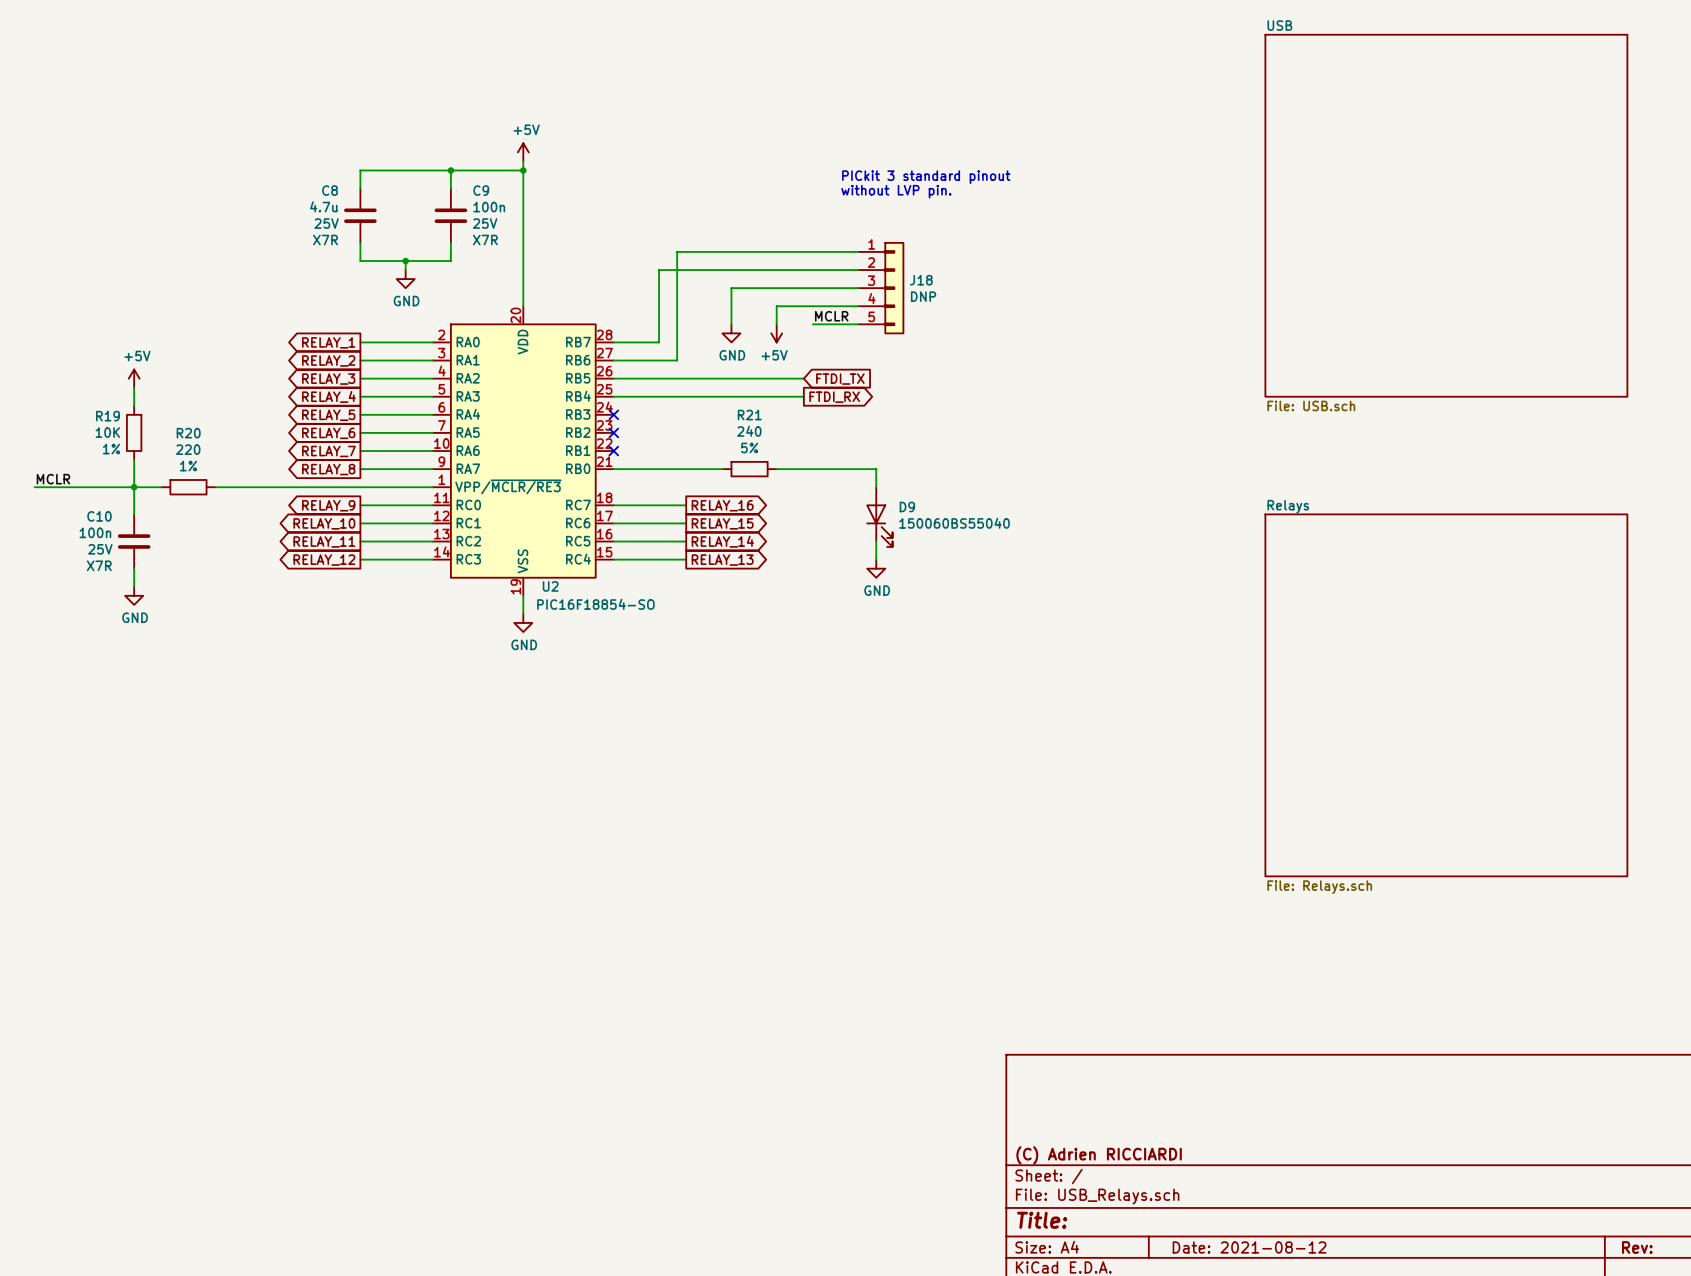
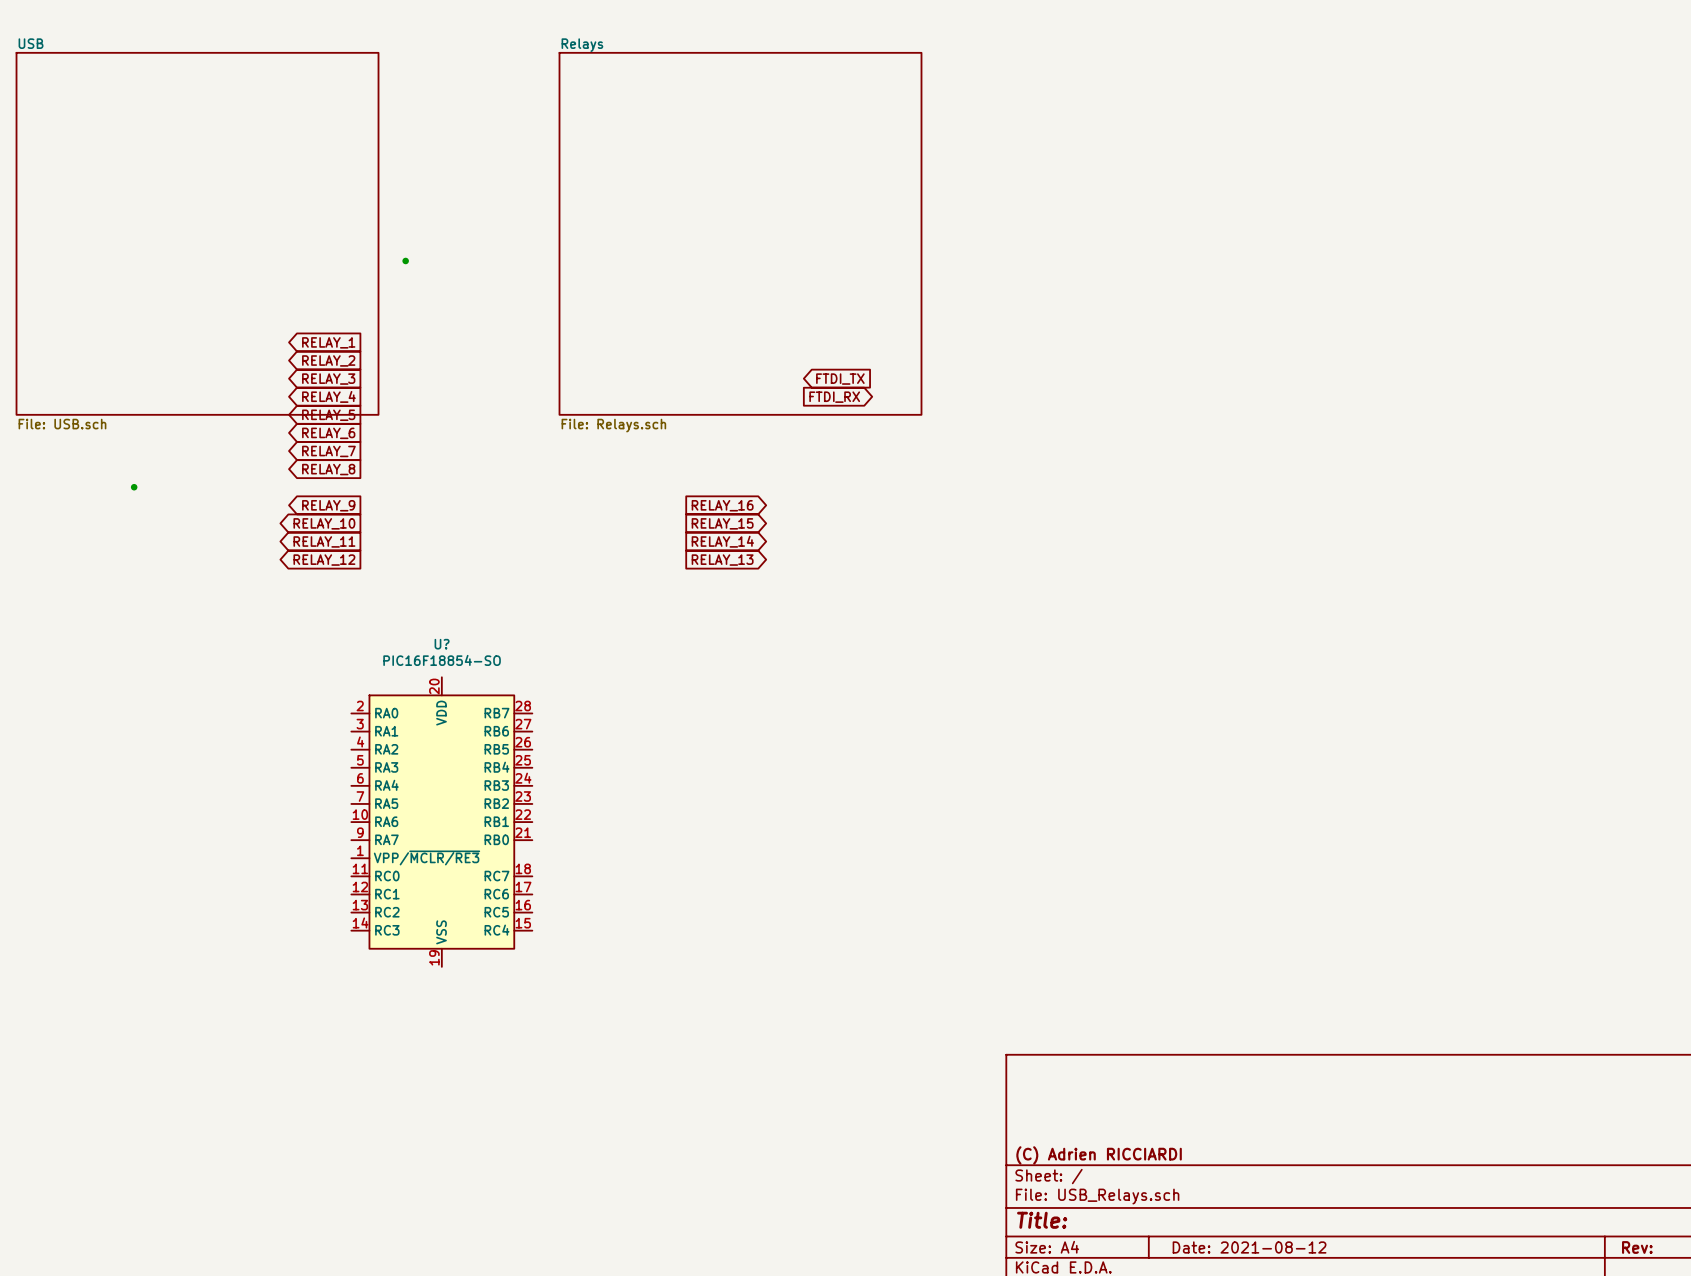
power symbol: +5V (523, 152) -> none
wire: (523, 161) (523, 306) -> none
wire: (450, 170) (450, 188) -> none
junction: (450, 170) -> none
wire: (523, 170) (360, 170) (360, 188) -> none
junction: (523, 170) -> none
text: PICkit 3 standard pinout (926, 177) -> none
text: without LVP pin. (896, 191) -> none
C8: 4.7u (360, 215) -> none
C9: 100n (450, 215) -> none
sheet USB: File: USB.sch (1446, 215) -> none
sheet USB: none -> File: USB.sch (197, 233)
sheet Relays: none -> File: Relays.sch (740, 233)
wire: (360, 242) (360, 260) (450, 260) (450, 242) -> none
wire: (858, 251) (677, 251) (677, 360) (613, 360) -> none
wire: (405, 260) (405, 270) -> none
wire: (858, 270) (659, 270) (659, 342) (613, 342) -> none
power symbol: GND (405, 279) -> none
wire: (858, 288) (731, 288) (731, 324) -> none
J18: DNP (881, 288) -> none
wire: (858, 306) (776, 306) (776, 324) -> none
label: MCLR (831, 316) -> none
wire: (812, 324) (858, 324) -> none
power symbol: GND (731, 333) -> none
power symbol: +5V (776, 333) -> none
wire: (360, 342) (432, 342) -> none
wire: (360, 360) (432, 360) -> none
power symbol: +5V (134, 378) -> none
wire: (360, 378) (432, 378) -> none
wire: (613, 378) (803, 378) -> none
wire: (134, 387) (134, 405) -> none
wire: (360, 396) (432, 396) -> none
wire: (613, 396) (803, 396) -> none
wire: (360, 414) (432, 414) -> none
no-connect mark: (613, 414) -> none
R19: 10K (134, 432) -> none
wire: (360, 432) (432, 432) -> none
no-connect mark: (613, 432) -> none
wire: (360, 451) (432, 451) -> none
U2: PIC16F18854-SO (523, 451) -> none
no-connect mark: (613, 451) -> none
wire: (134, 460) (134, 514) -> none
wire: (360, 469) (432, 469) -> none
wire: (613, 469) (722, 469) -> none
R21: 240 (749, 469) -> none
wire: (776, 469) (876, 469) (876, 487) -> none
label: MCLR (53, 479) -> none
wire: (34, 487) (161, 487) -> none
R20: 220 (188, 487) -> none
wire: (215, 487) (432, 487) -> none
wire: (360, 505) (432, 505) -> none
wire: (613, 505) (686, 505) -> none
D9: 150060BS55040 (879, 517) -> none
wire: (360, 523) (432, 523) -> none
wire: (613, 523) (686, 523) -> none
C10: 100n (134, 541) -> none
wire: (360, 541) (432, 541) -> none
wire: (613, 541) (686, 541) -> none
wire: (876, 541) (876, 559) -> none
wire: (360, 559) (432, 559) -> none
wire: (613, 559) (686, 559) -> none
wire: (134, 568) (134, 586) -> none
power symbol: GND (876, 568) -> none
power symbol: GND (134, 595) -> none
wire: (523, 595) (523, 613) -> none
power symbol: GND (523, 622) -> none
sheet Relays: File: Relays.sch (1446, 695) -> none
U?: none -> PIC16F18854-SO (441, 822)

